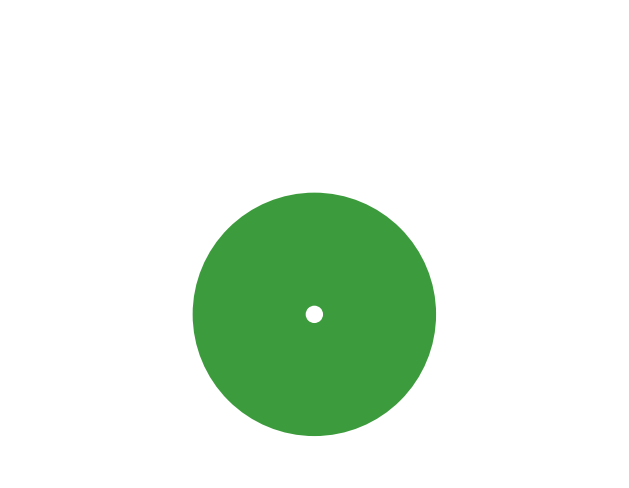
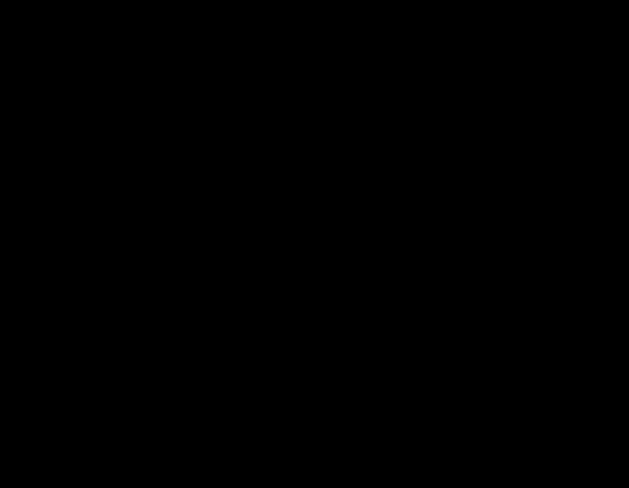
part: (314, 314) -> none

